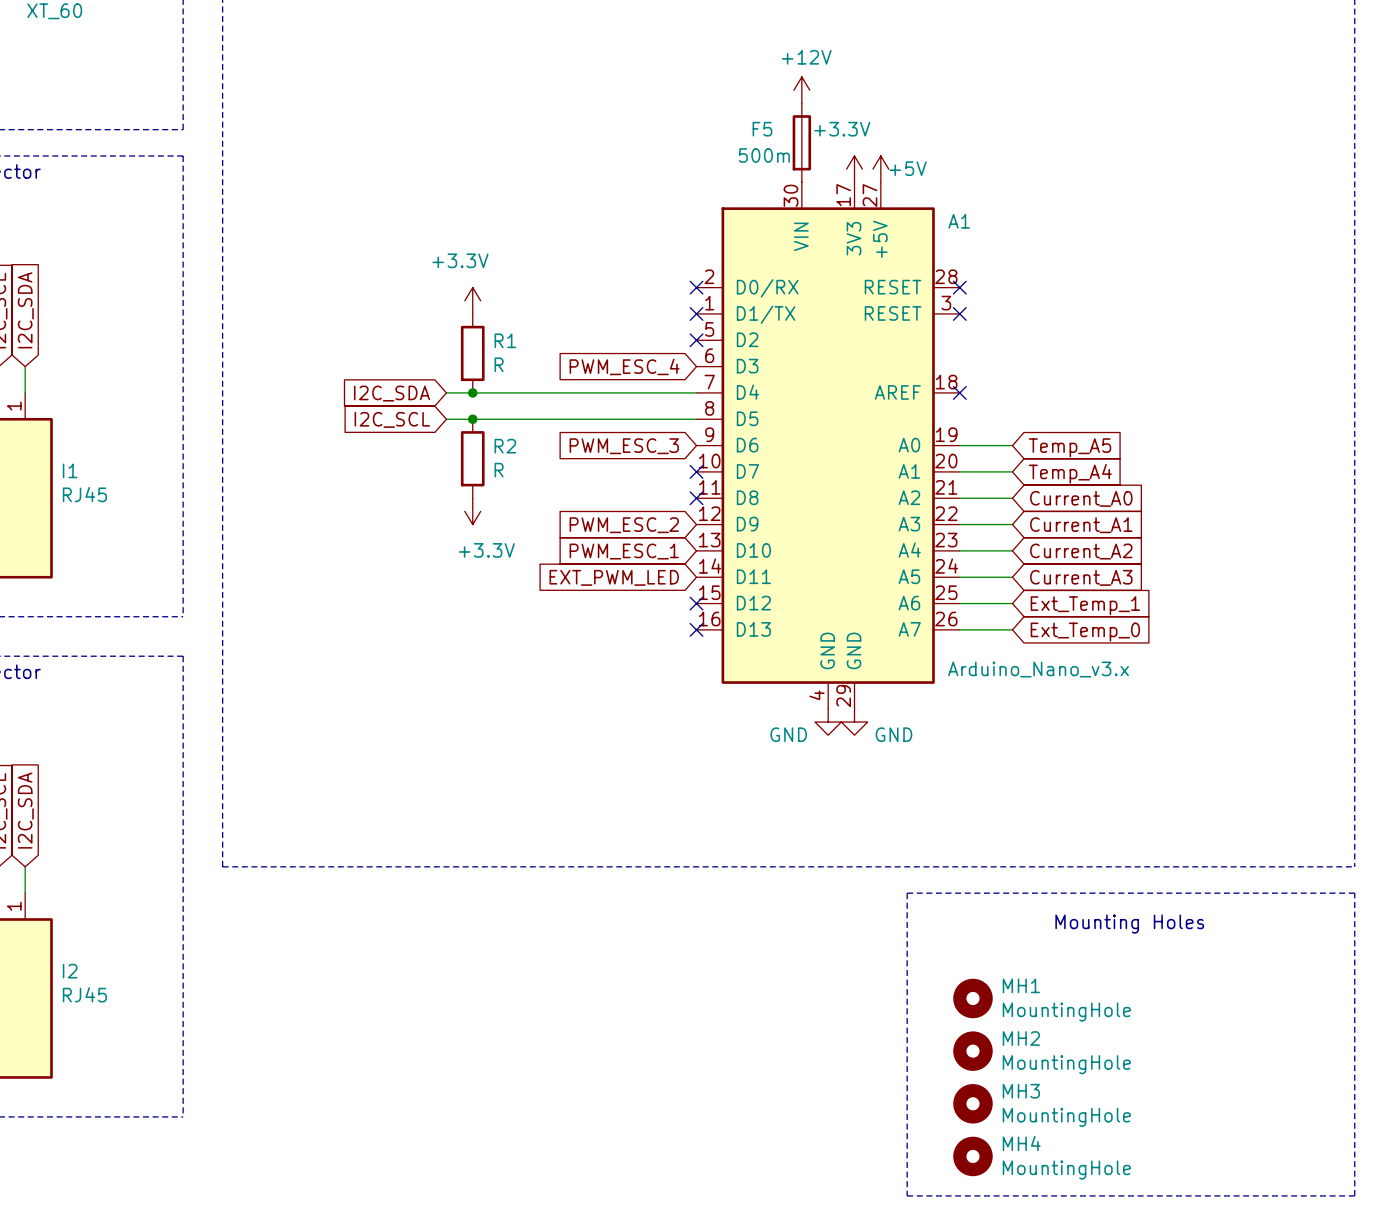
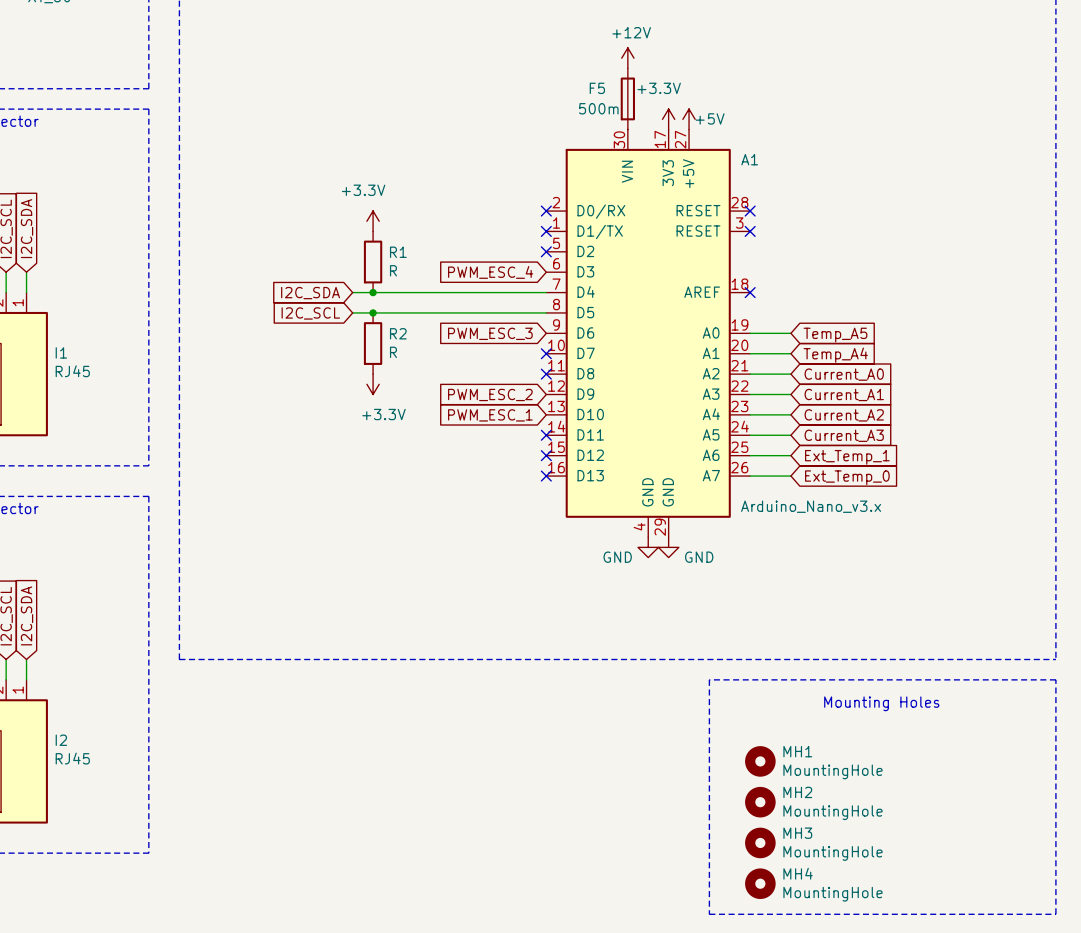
global label: EXT_PWM_LED (614, 577) -> none
no-connect mark: none -> (546, 435)

